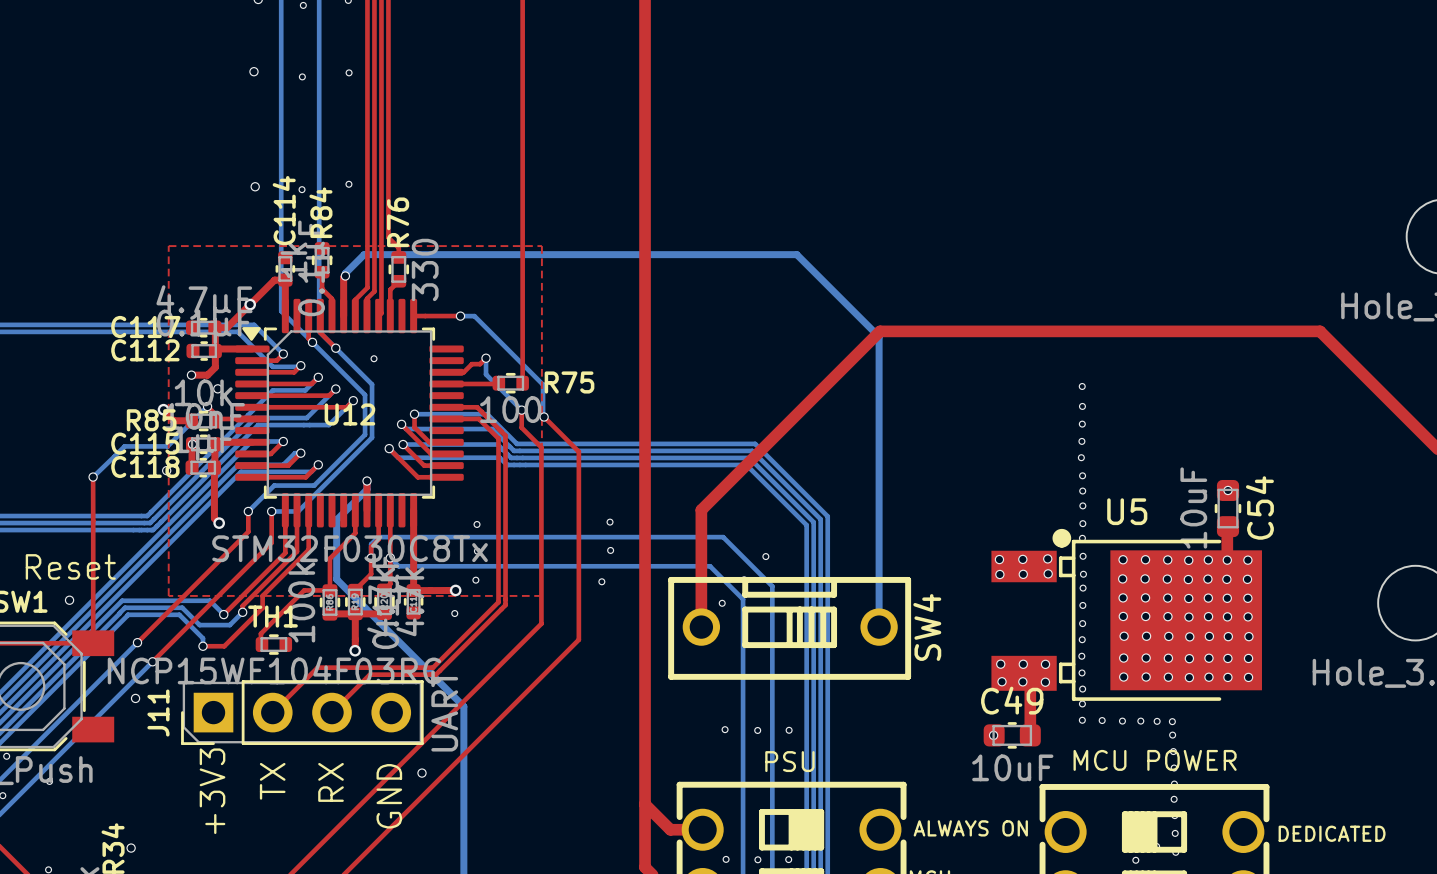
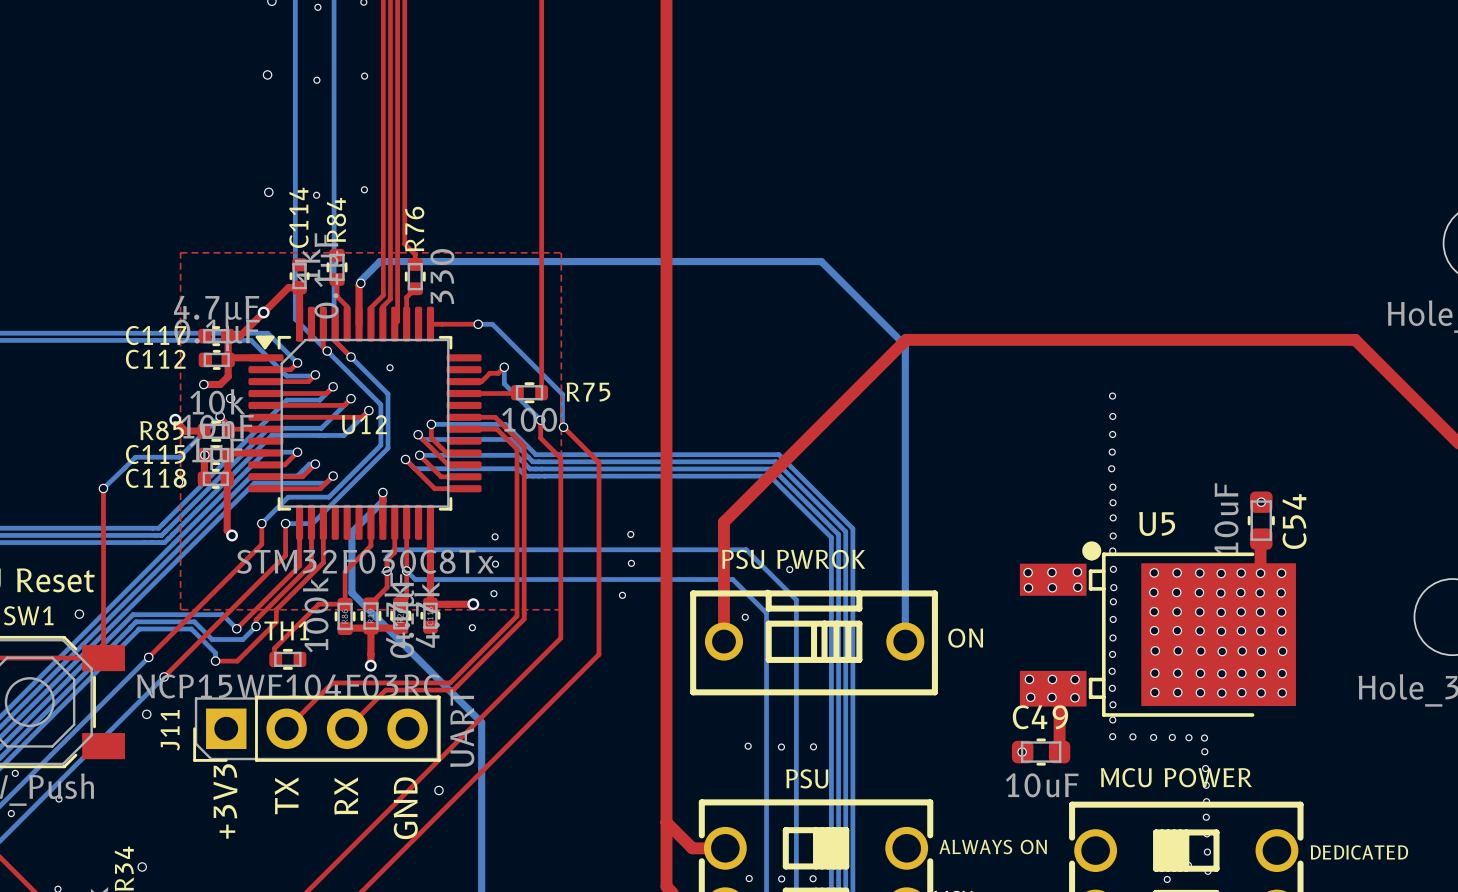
text: none -> PSU PWROK (793, 559)
text: none -> ON (965, 638)
SW4 name: SW4 (927, 627) -> none

